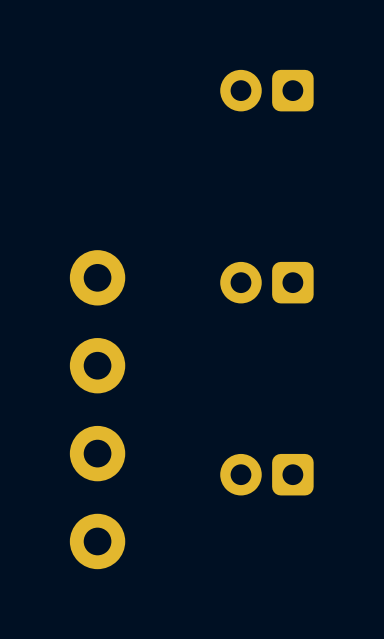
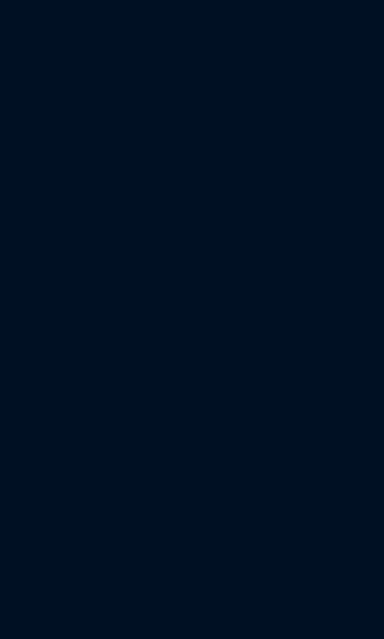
part: (266, 90) -> none
part: (266, 282) -> none
part: (97, 409) -> none
part: (266, 474) -> none

